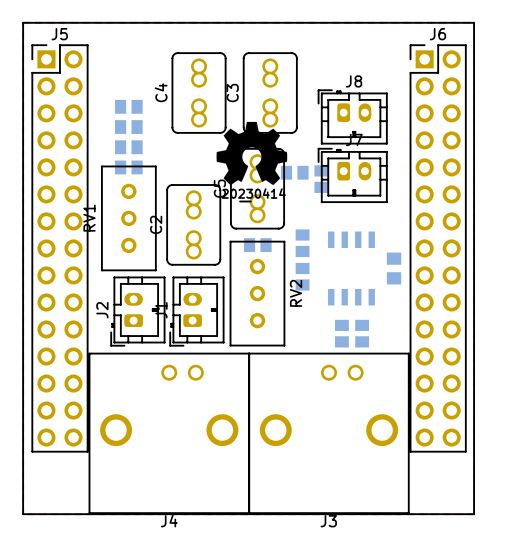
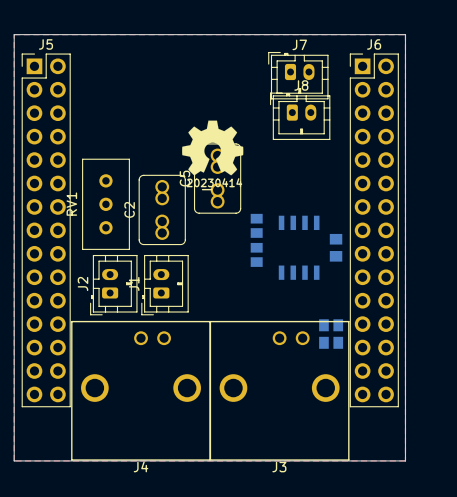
C4: (199, 93) -> none
C3: (270, 93) -> none
part: (128, 106) -> none
part: (128, 127) -> none
part: (128, 147) -> none
part: (128, 167) -> none
part: (294, 172) -> none
J7 position: (352, 175) -> (298, 75)
part: (321, 179) -> none
part: (257, 245) -> none
RV2: (257, 293) -> none
part: (341, 333) -> none
part: (362, 333) -> none
part: none -> (331, 325)
part: none -> (331, 342)

